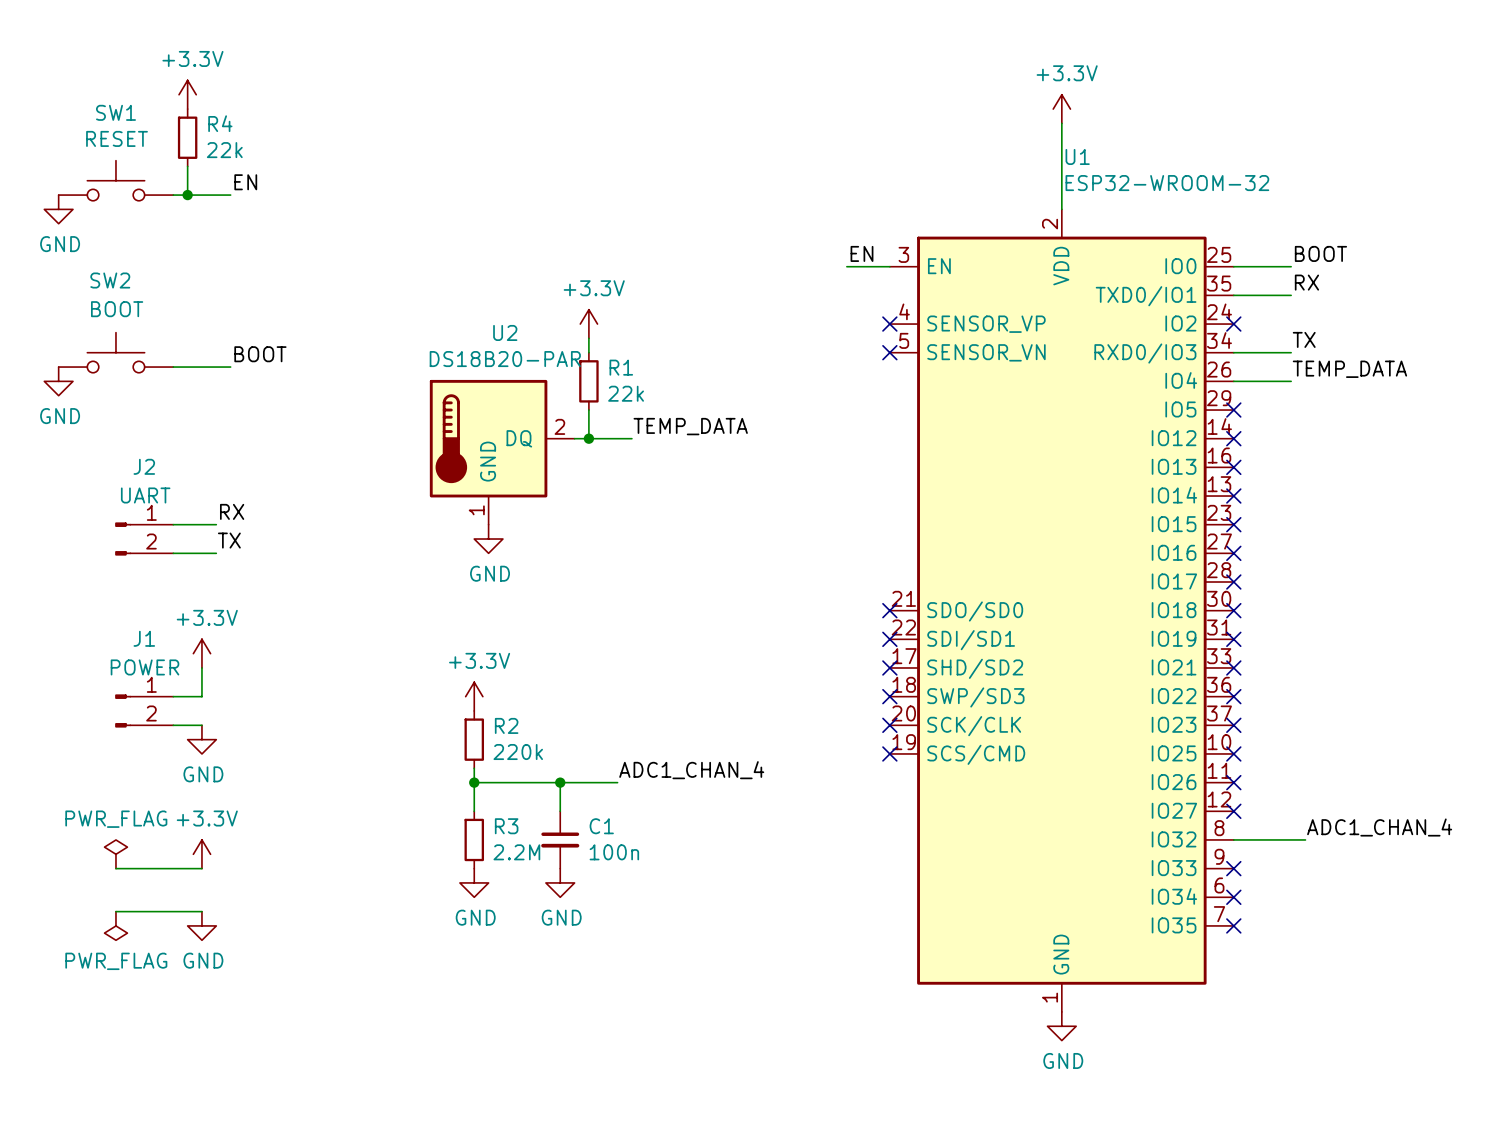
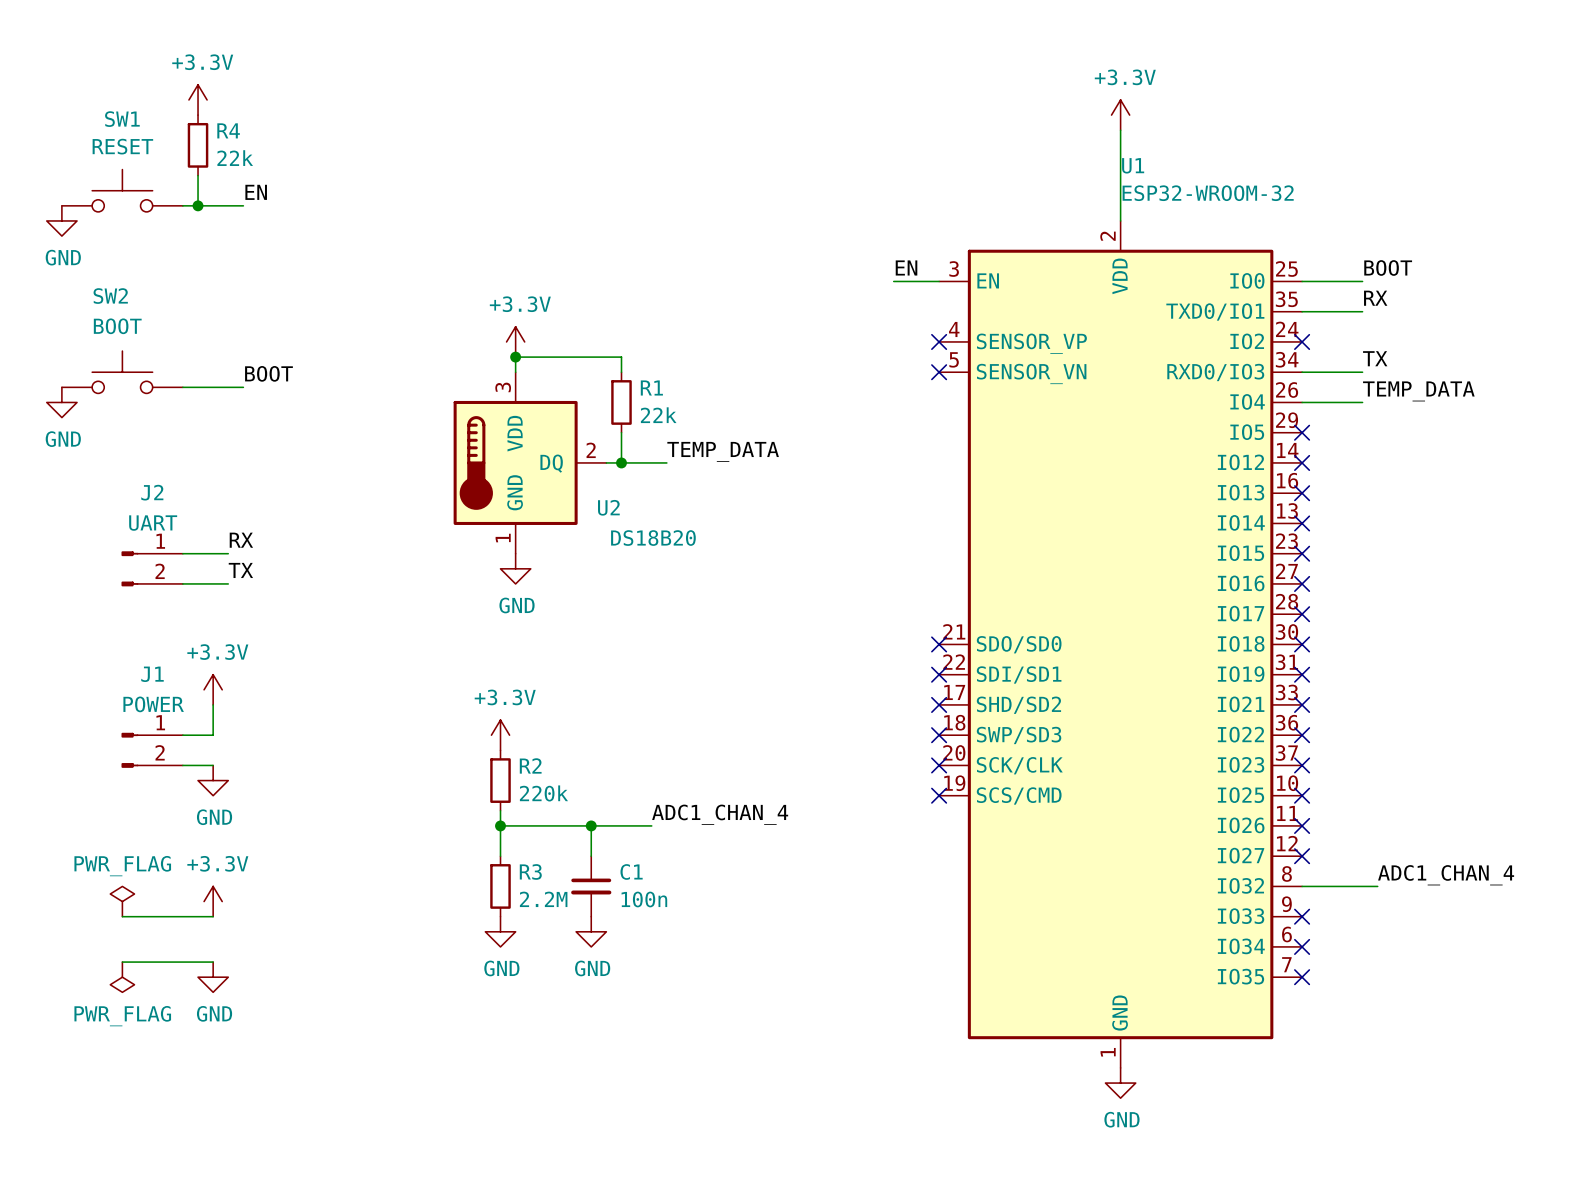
power symbol position: +3.3V (588, 324) -> +3.3V (515, 341)
U2 name position: U2 (505, 332) -> U2 (608, 507)
junction: none -> (515, 357)
wire: none -> (621, 357) (515, 357) (515, 372)
U2 value: DS18B20-PAR (505, 359) -> DS18B20 (653, 538)
U2 symbol: [429, 379, 575, 525] -> [453, 372, 607, 554]

